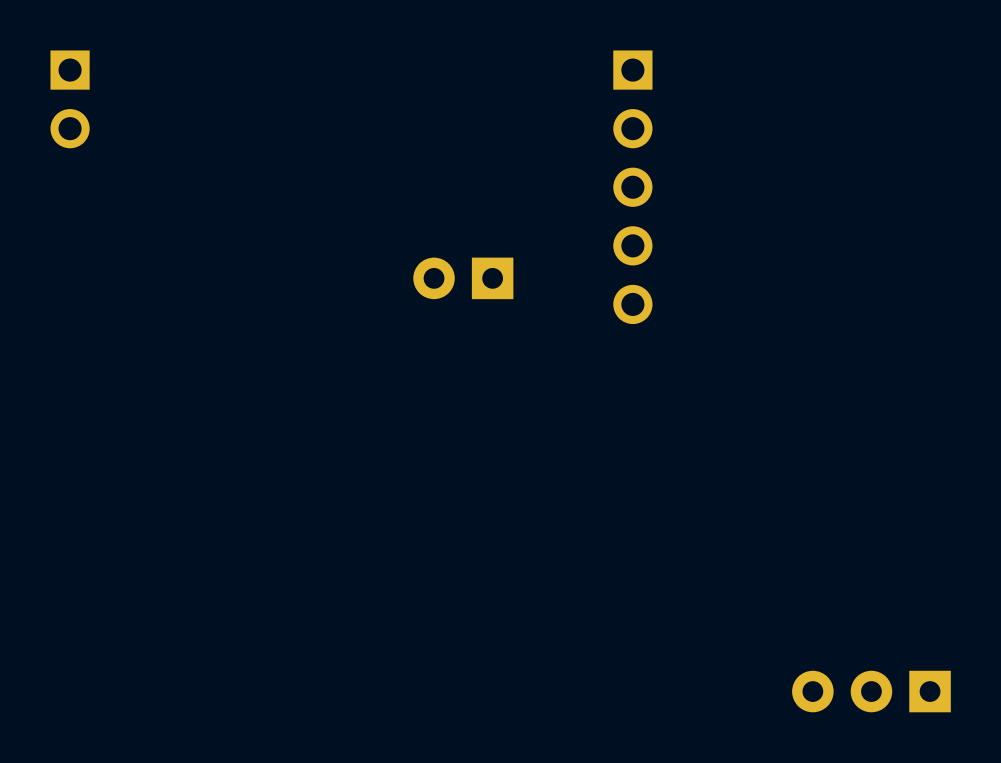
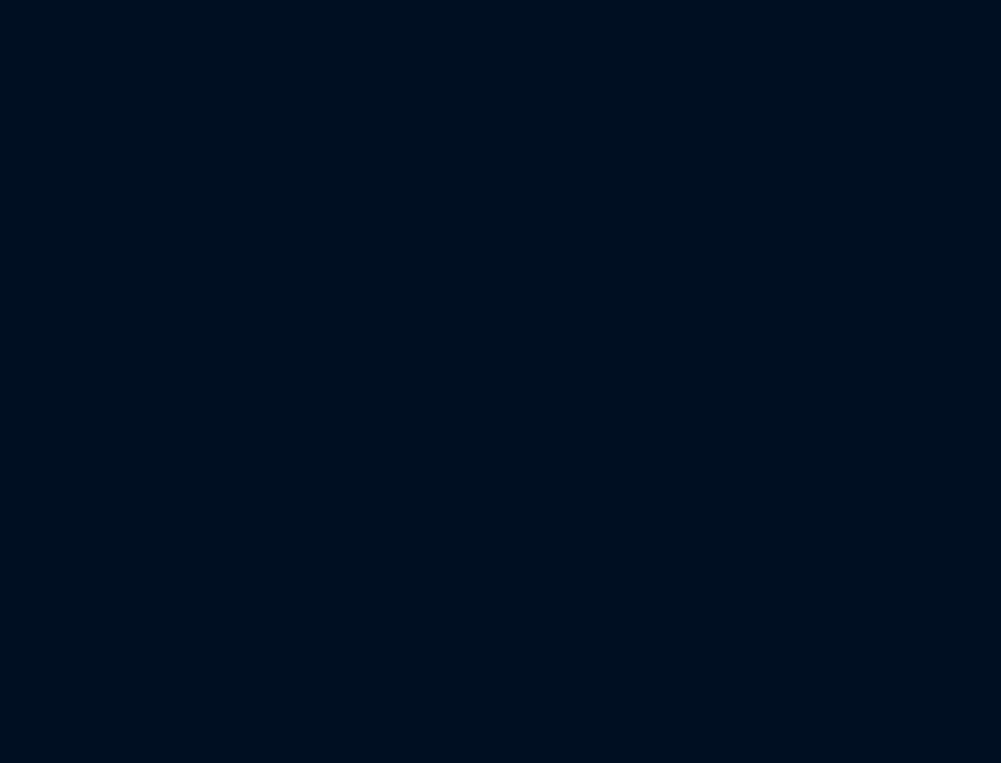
part: (70, 99) -> none
part: (632, 187) -> none
part: (463, 278) -> none
part: (871, 691) -> none

